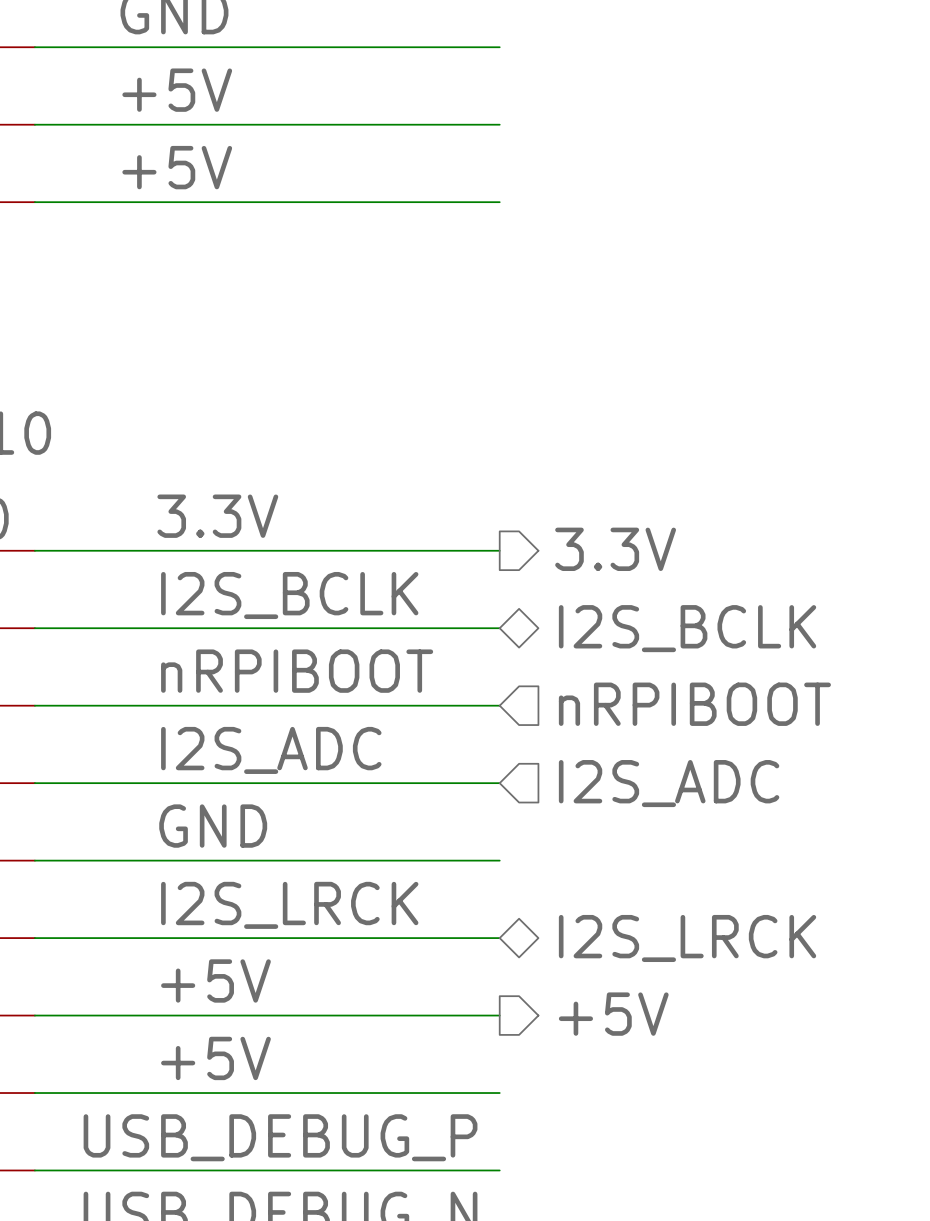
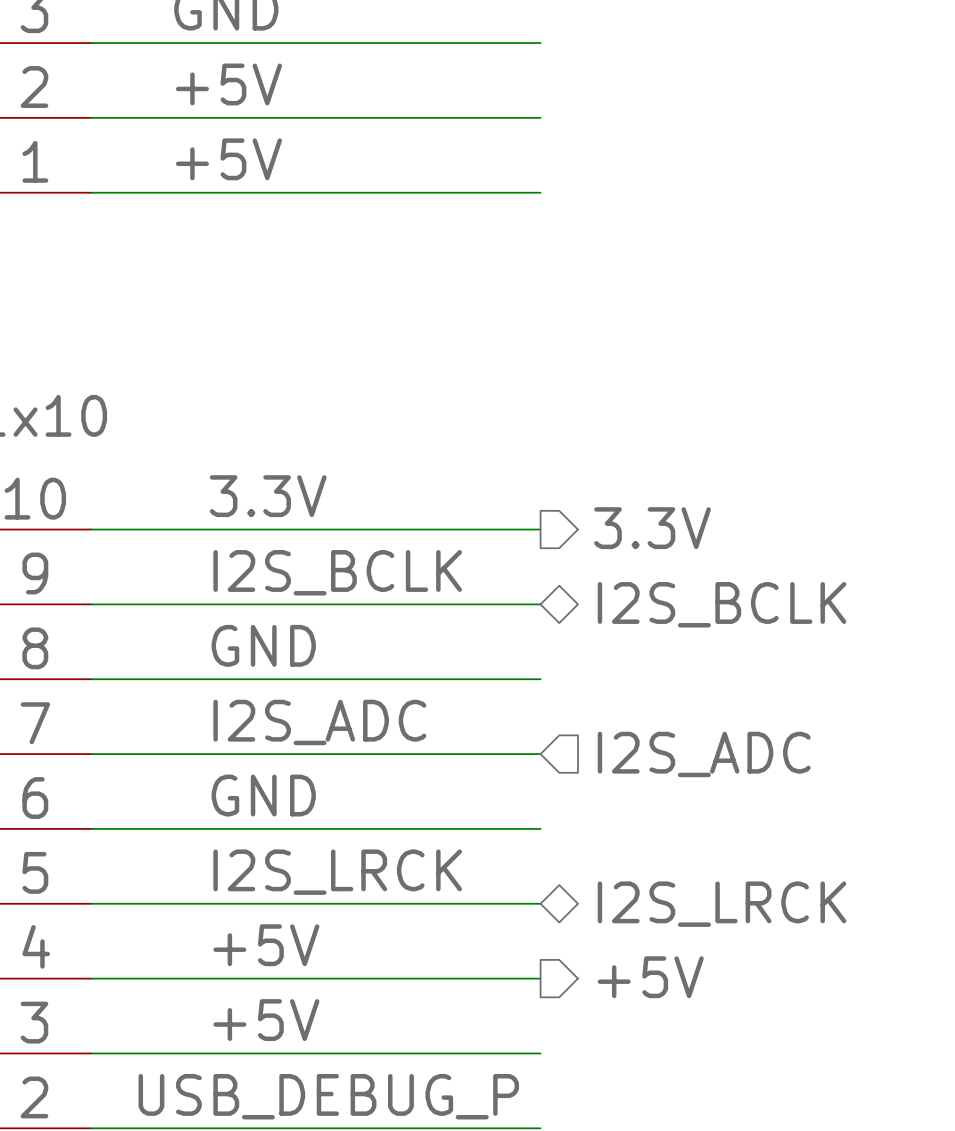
label: nRPIBOOT (297, 671) -> GND (263, 645)
hierarchical label: nRPIBOOT (694, 704) -> none

